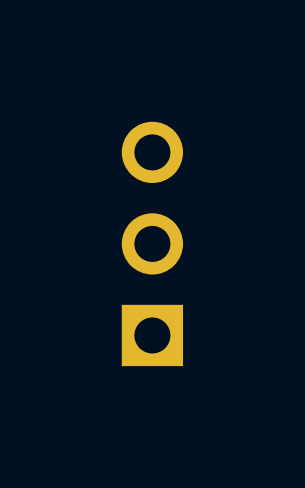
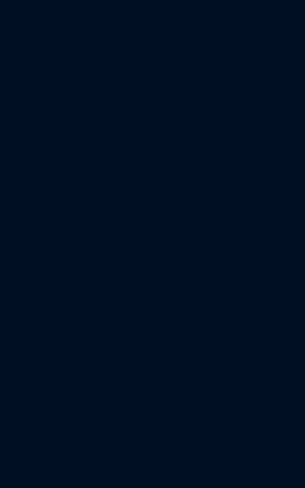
part: (152, 243) -> none

